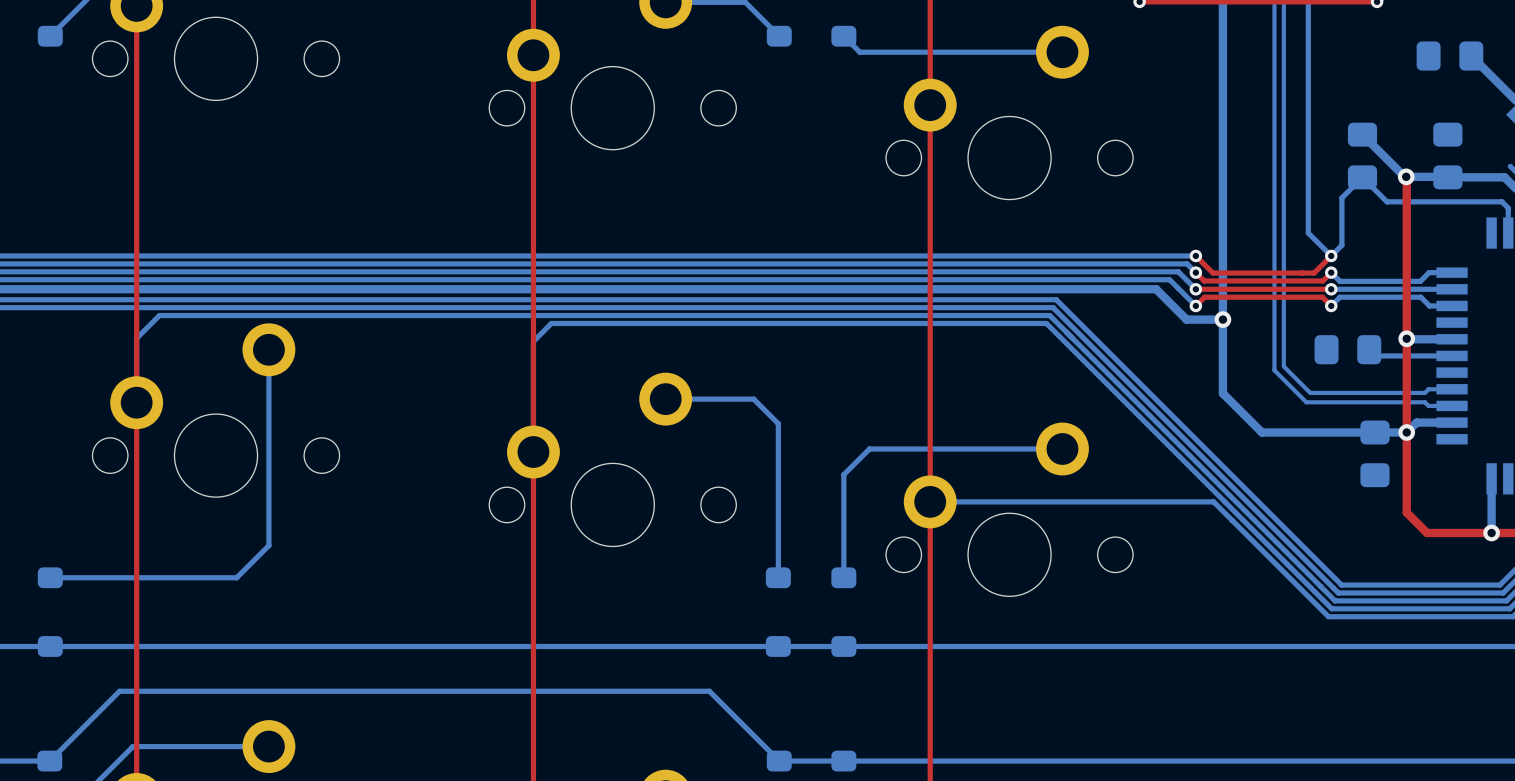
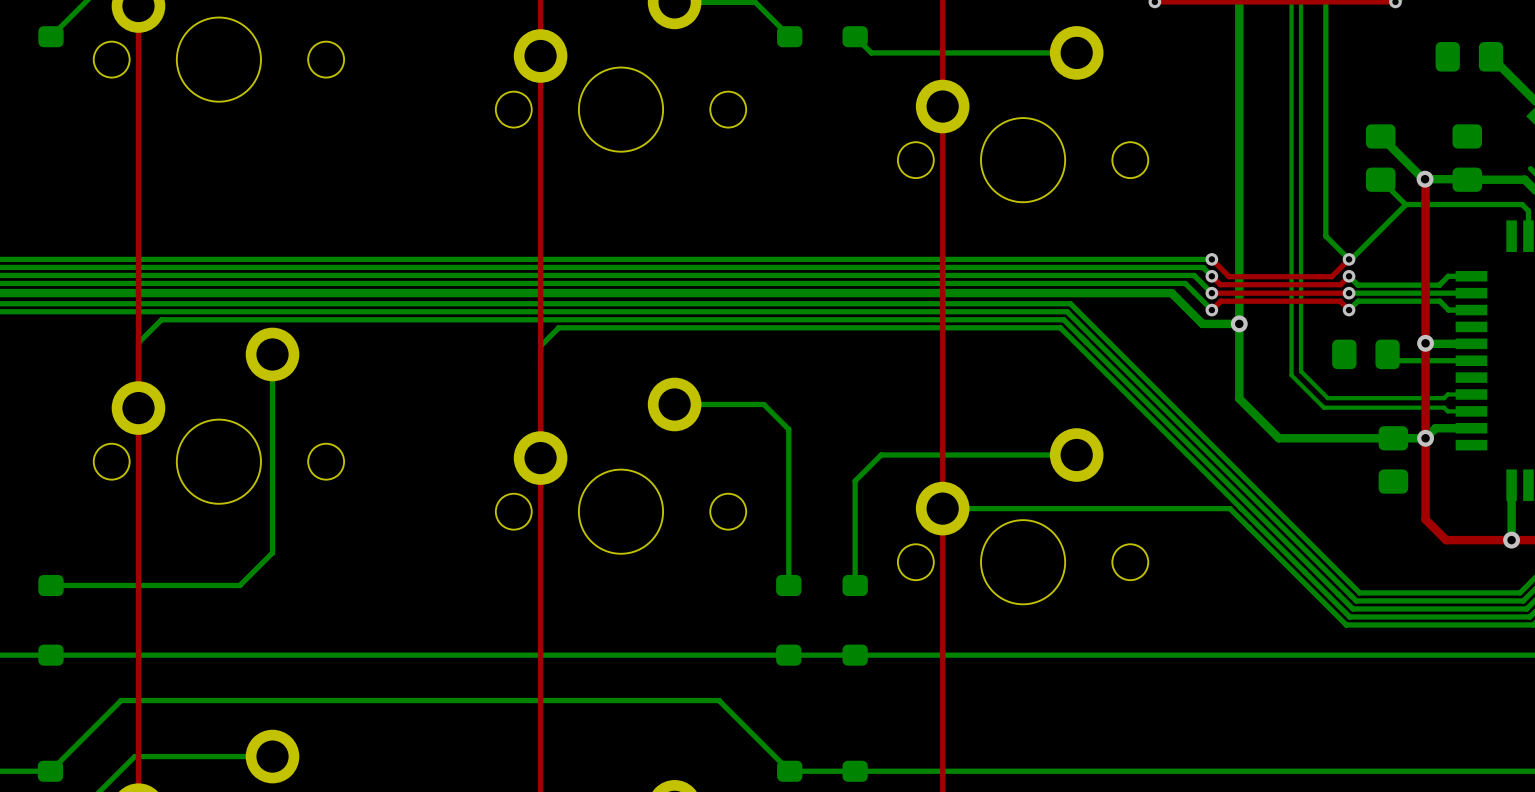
bottom track: (1362, 177) (1341, 197) (1341, 245) (1331, 255) -> none
bottom track: none -> (1406, 204) (1350, 260)

